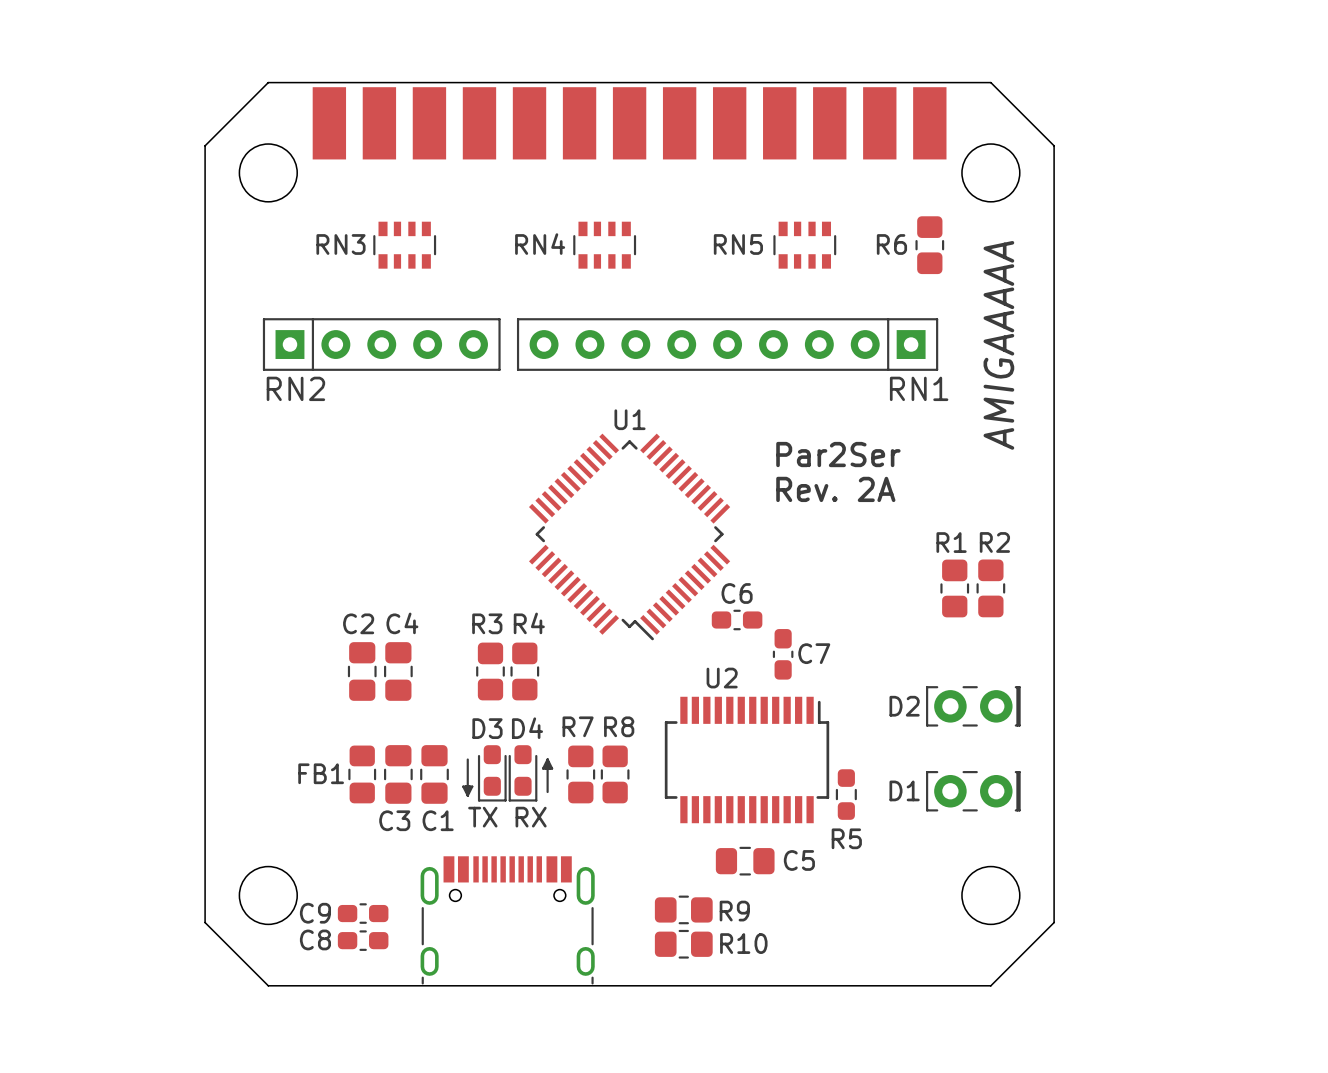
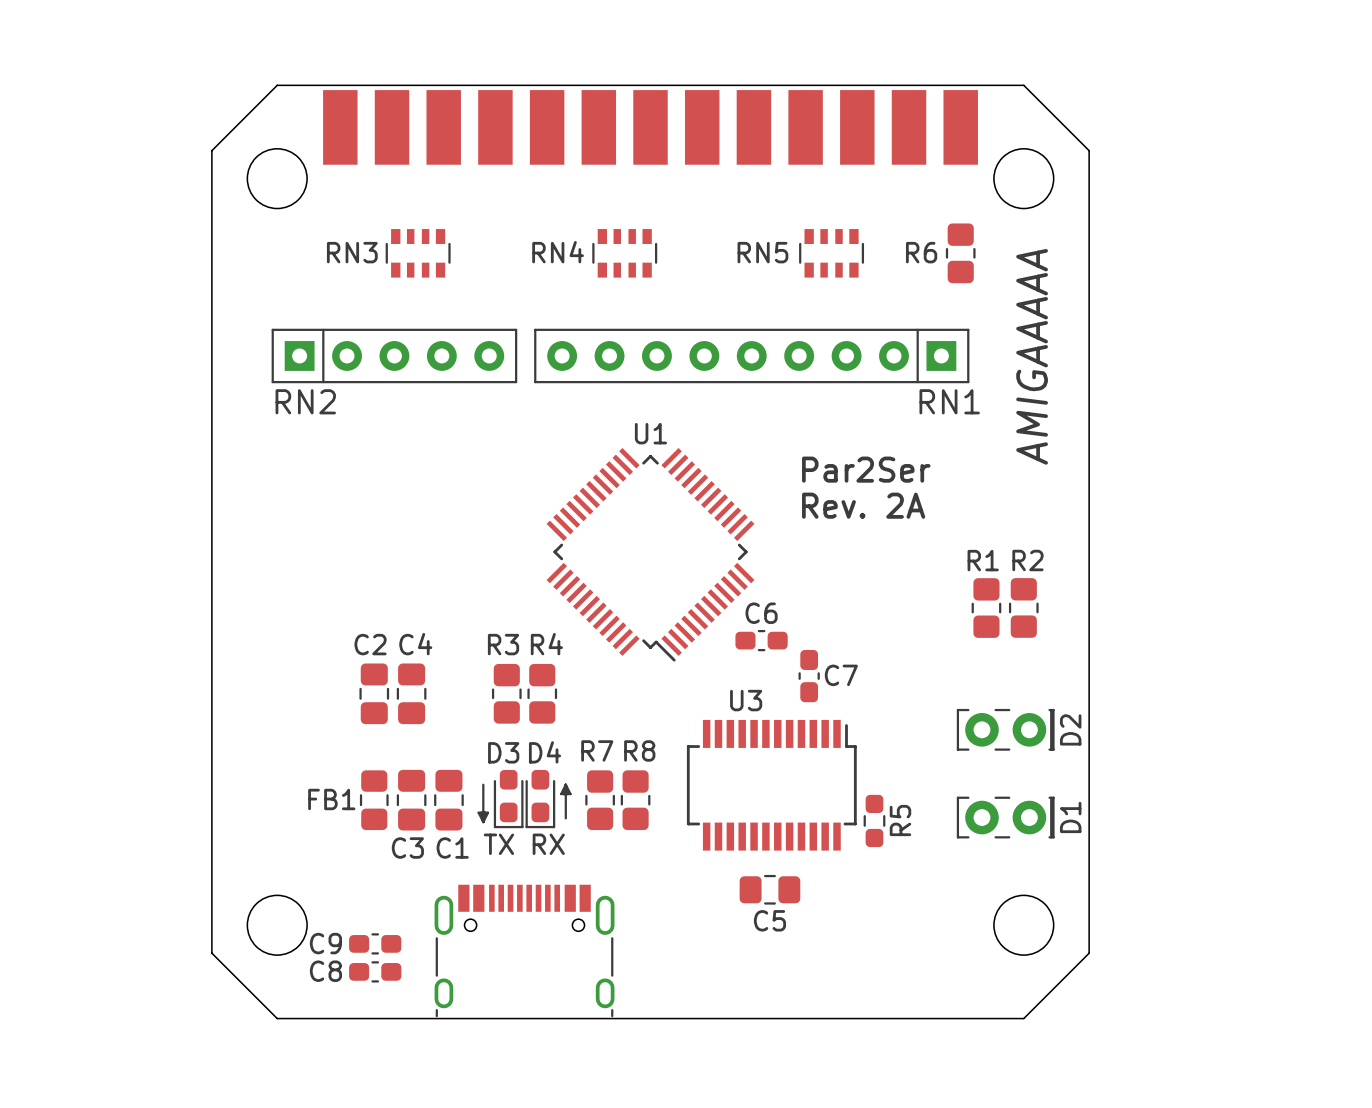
U2 name: U2 (722, 678) -> U3 (746, 700)
D2 name rotation: 0° (904, 706) -> 90° counterclockwise (1070, 729)
D2 name position: D2 (904, 706) -> D2 (1070, 729)
D1 name rotation: 0° (904, 790) -> 90° counterclockwise (1070, 817)
D1 name position: D1 (904, 790) -> D1 (1070, 817)
R5 name rotation: 0° (846, 838) -> 90° counterclockwise (900, 820)
R5 name position: R5 (846, 838) -> R5 (900, 820)
C5 name position: C5 (799, 860) -> C5 (769, 920)
R9: (683, 909) -> none
R10: (683, 944) -> none

